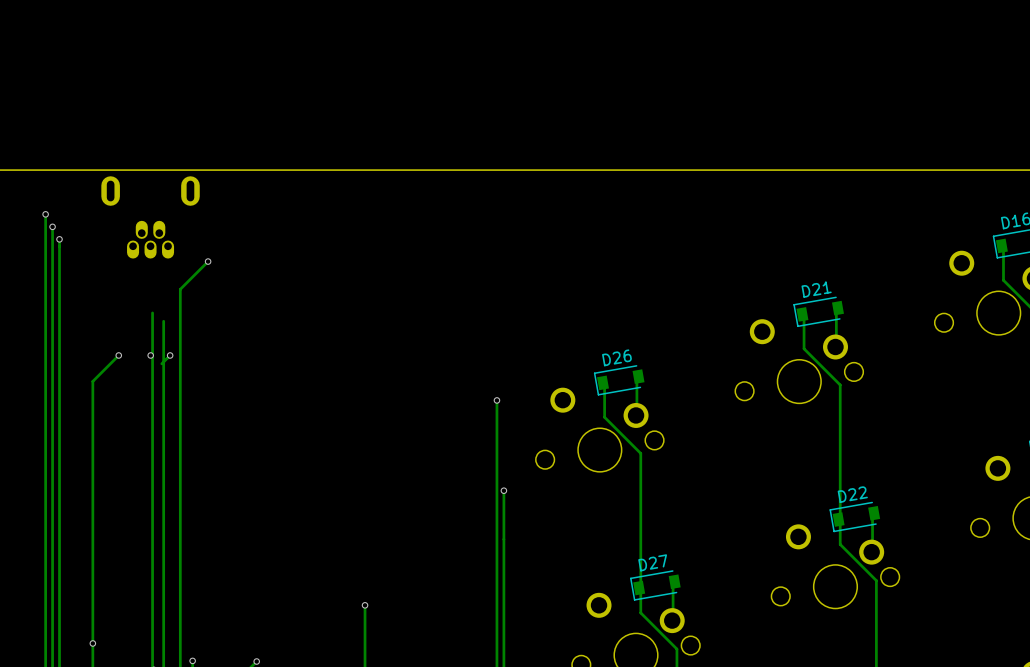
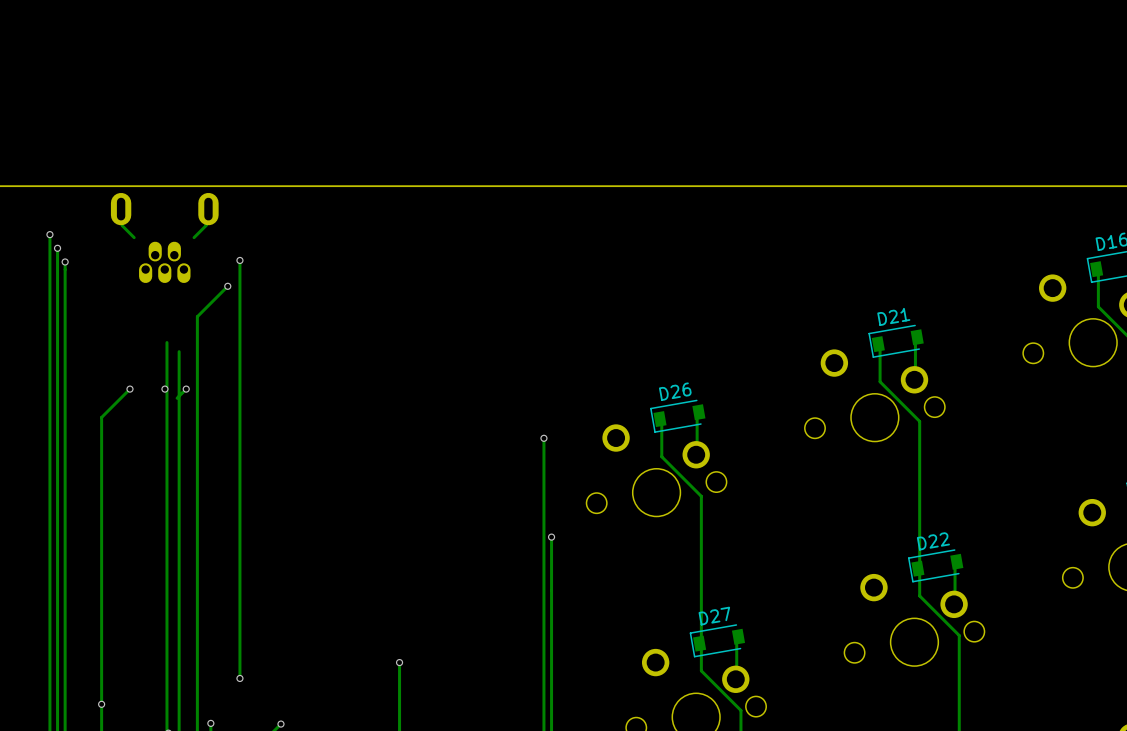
track: none -> (122, 205) (122, 225) (134, 237)
track: none -> (206, 205) (206, 225) (194, 237)
track: none -> (239, 260) (239, 678)
via: none -> (239, 260)
via: none -> (239, 678)

